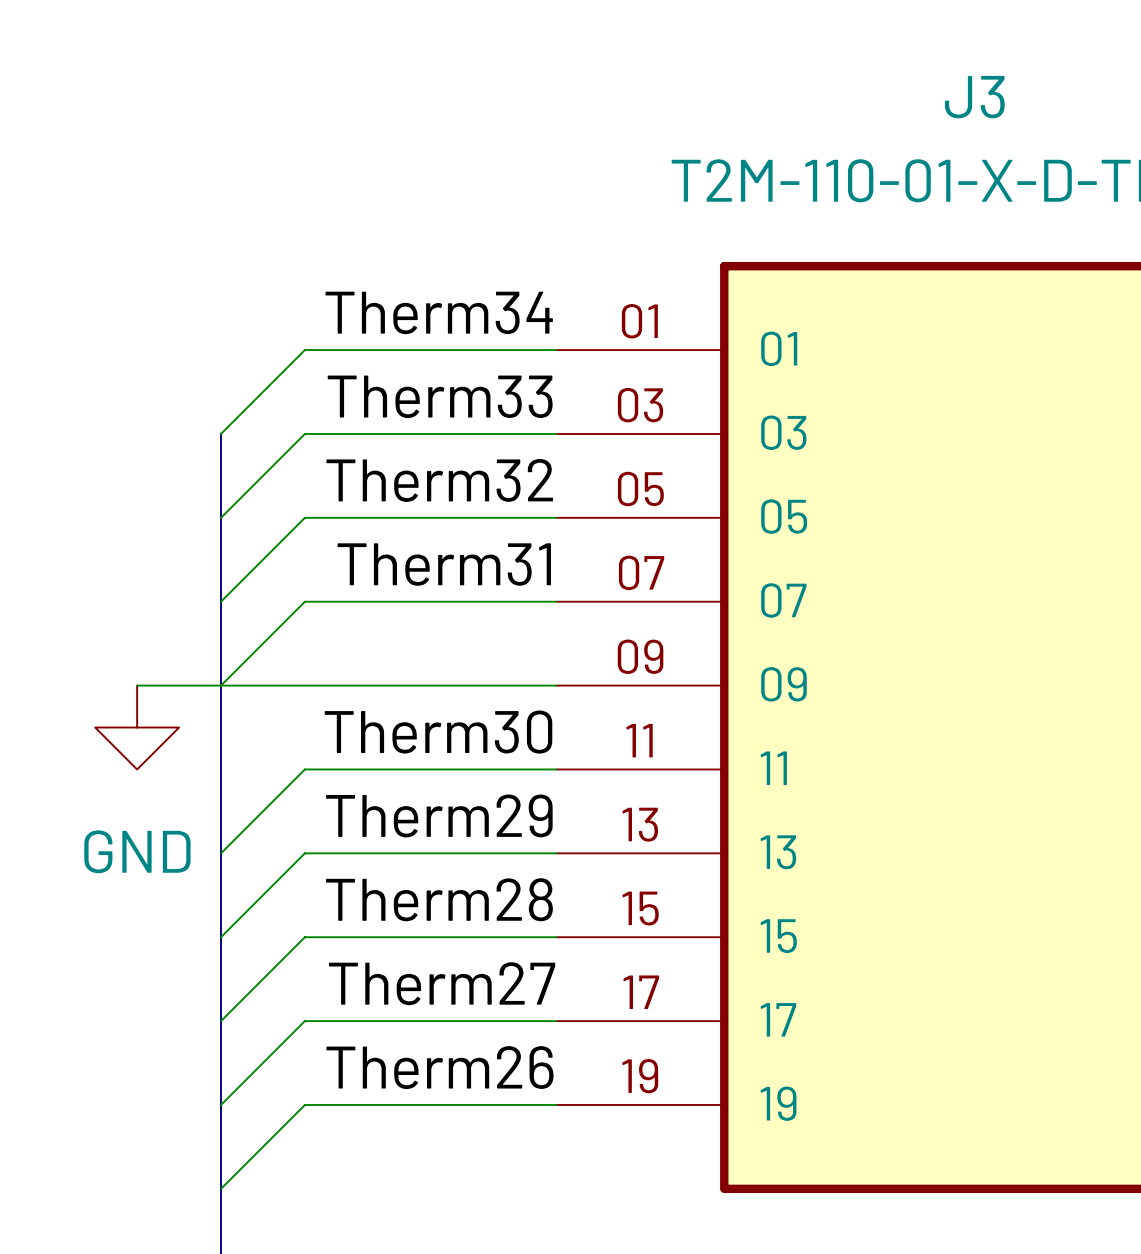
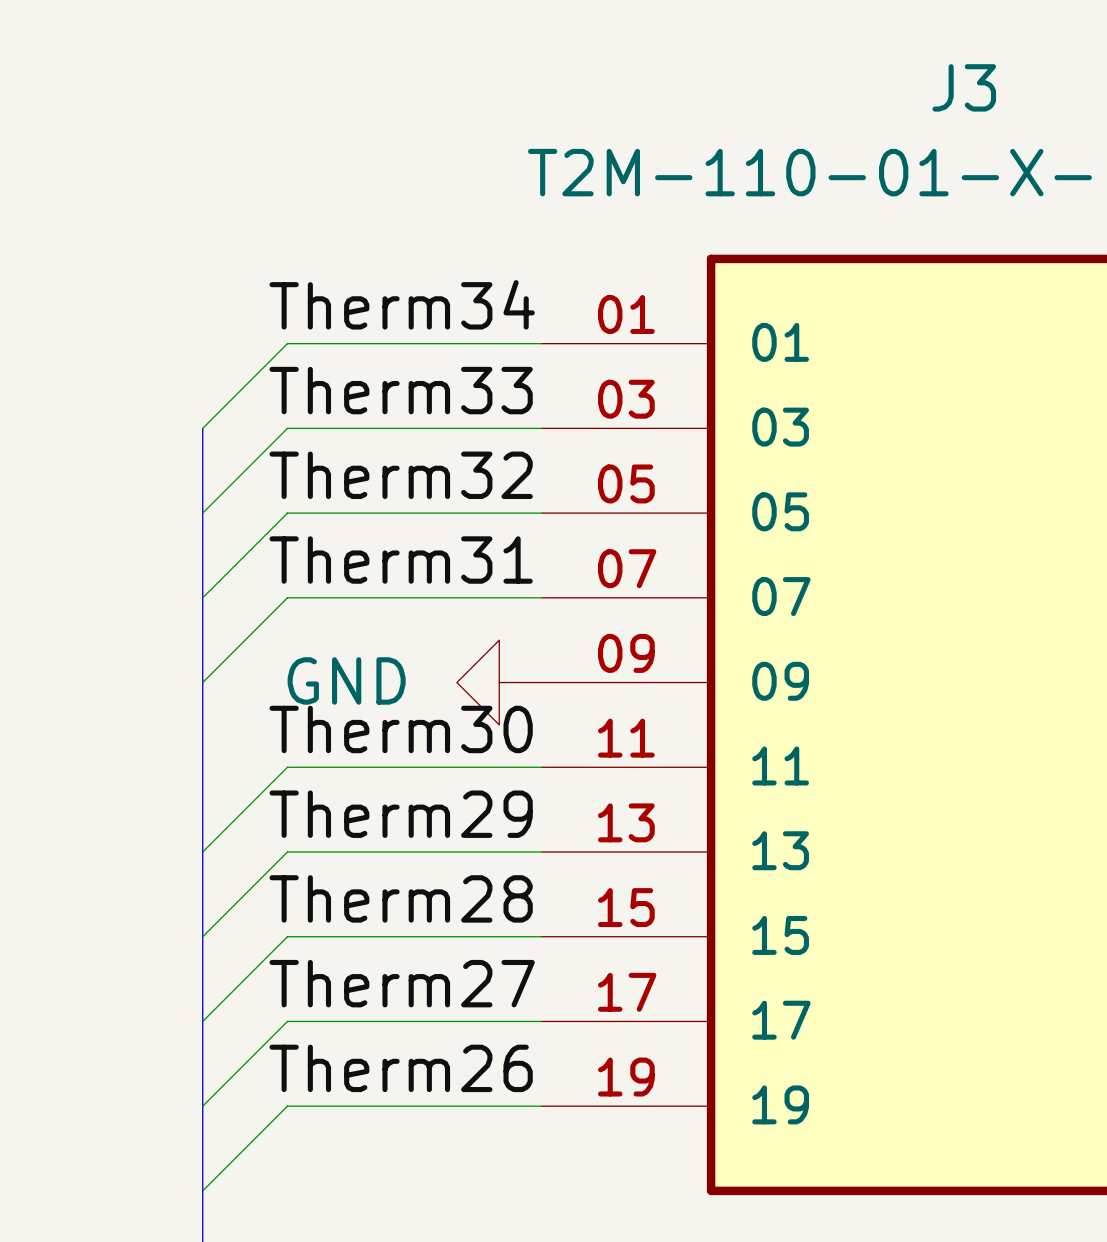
wire: (137, 685) (556, 685) -> none
power symbol rotation: 0° (137, 727) -> 90° clockwise (499, 682)
power symbol position: GND (137, 727) -> GND (499, 682)

